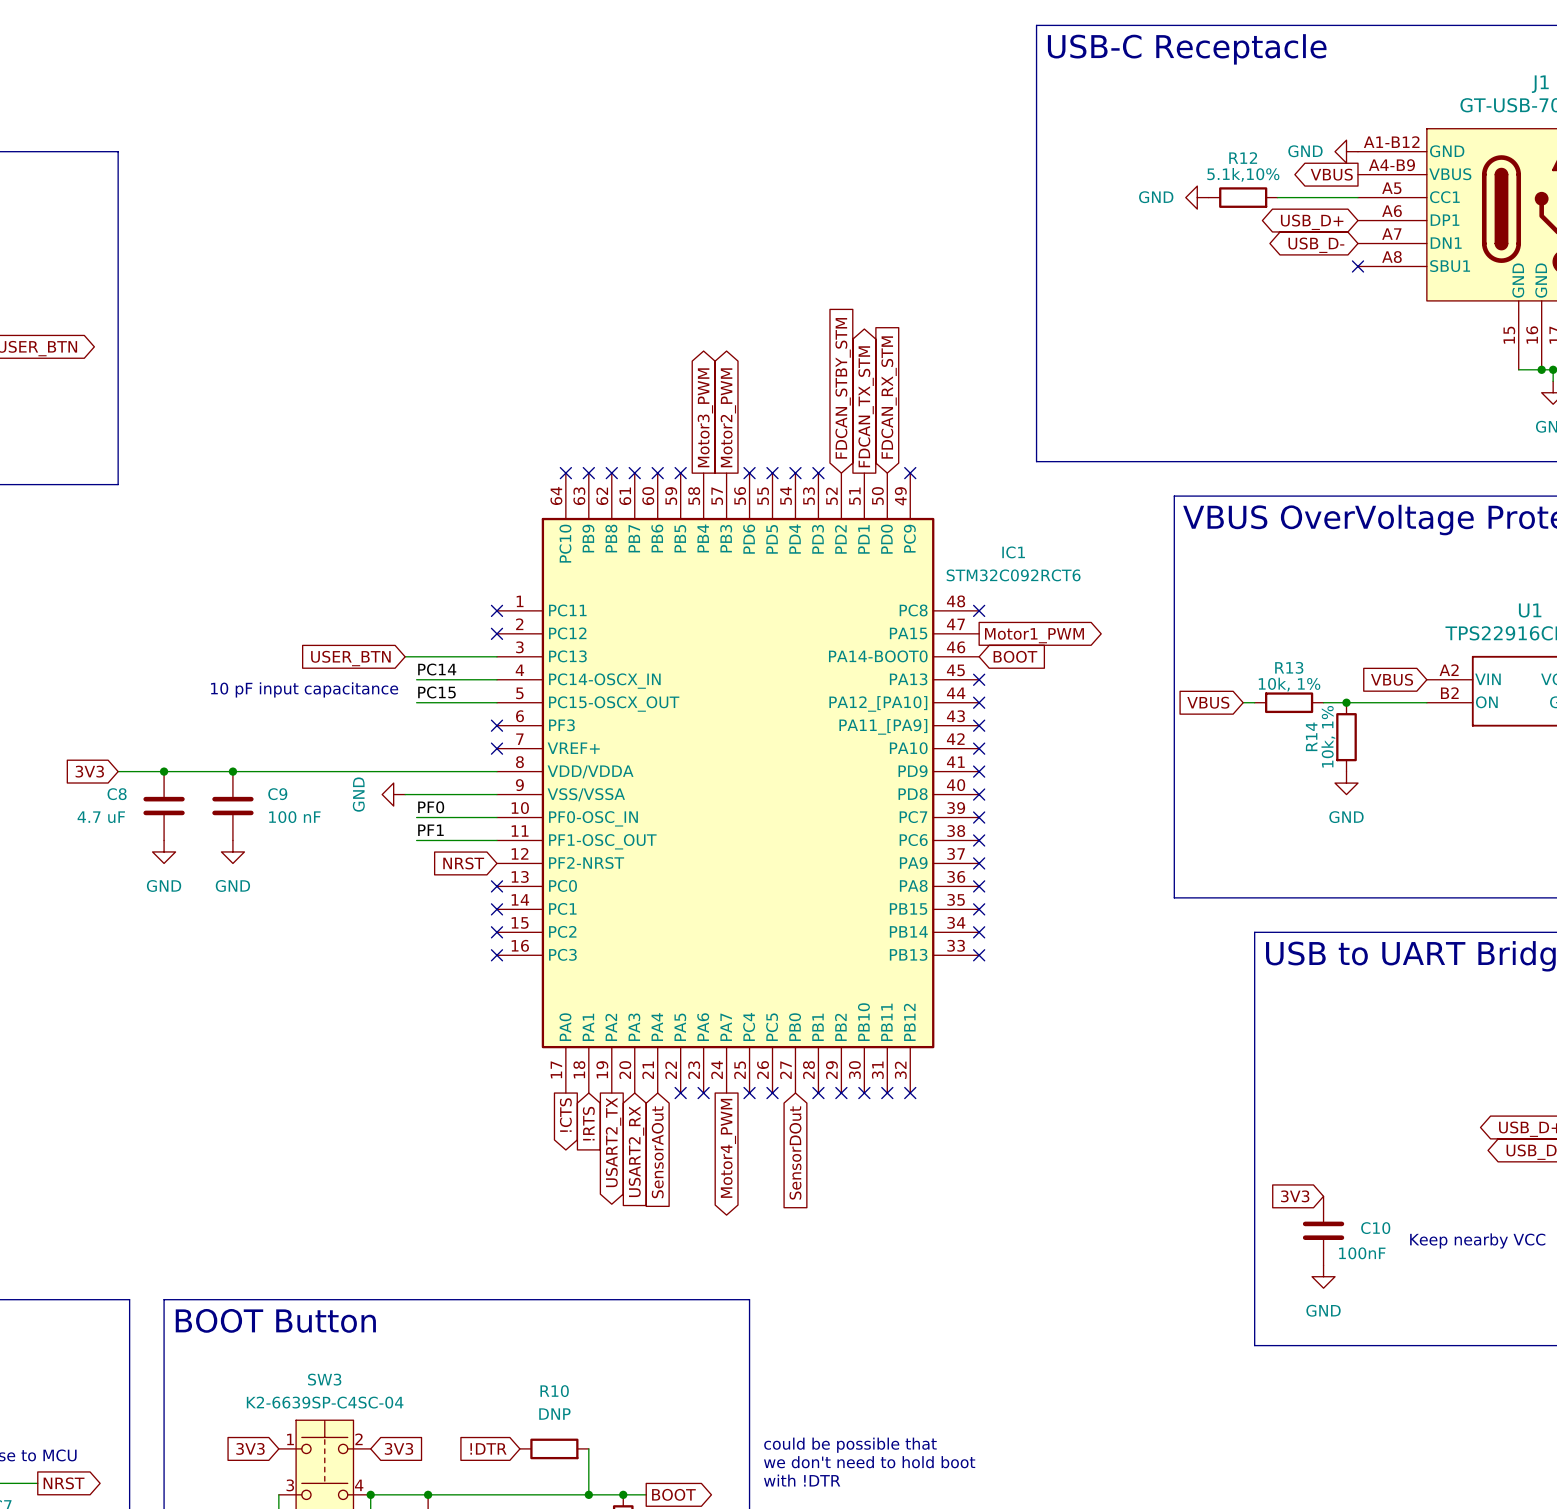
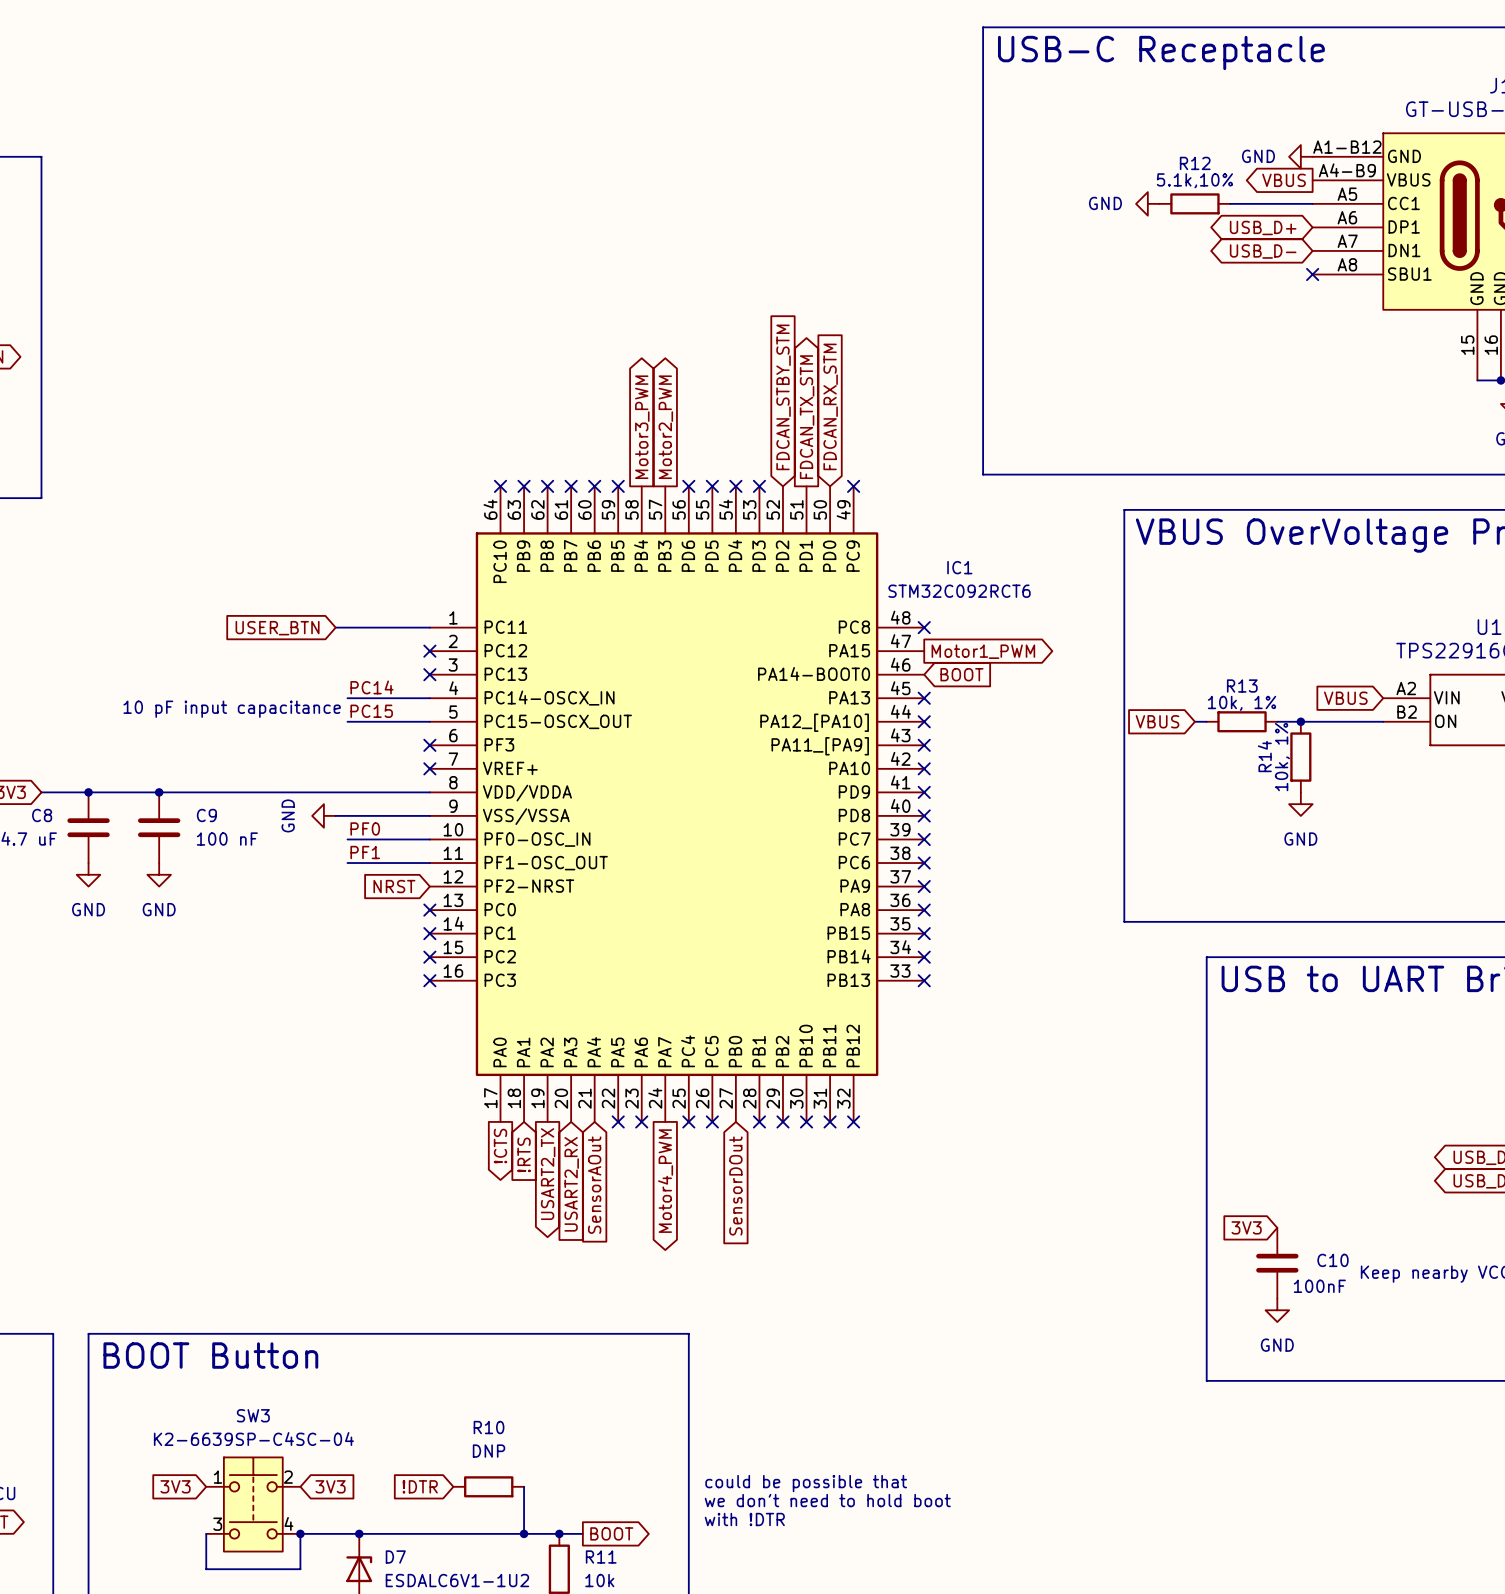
no-connect mark position: (496, 610) -> (429, 674)
wire: (405, 656) (496, 656) -> (335, 627) (429, 627)
global label position: USER_BTN (350, 658) -> USER_BTN (277, 628)

